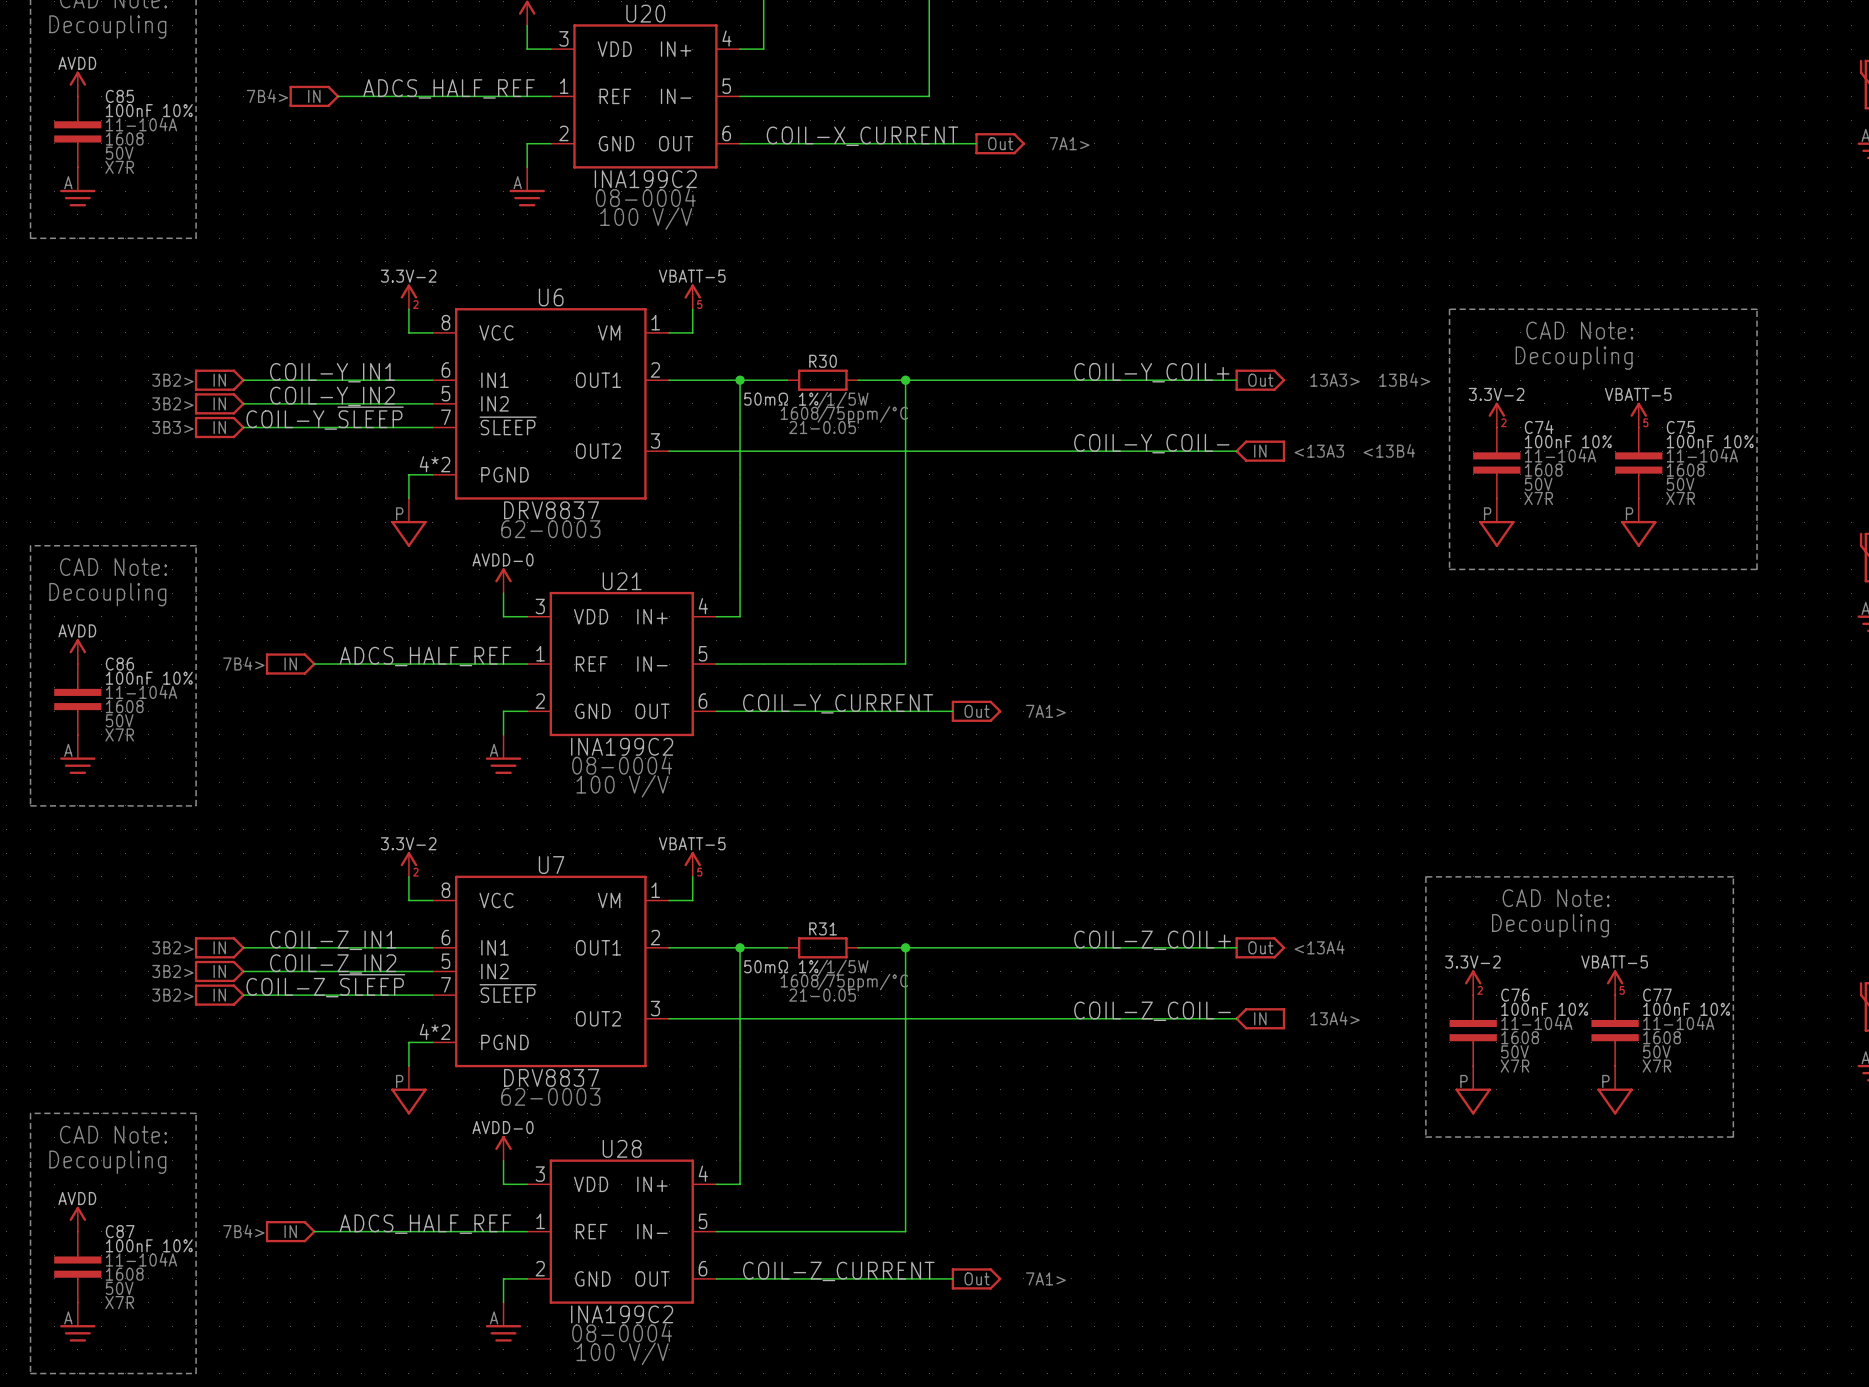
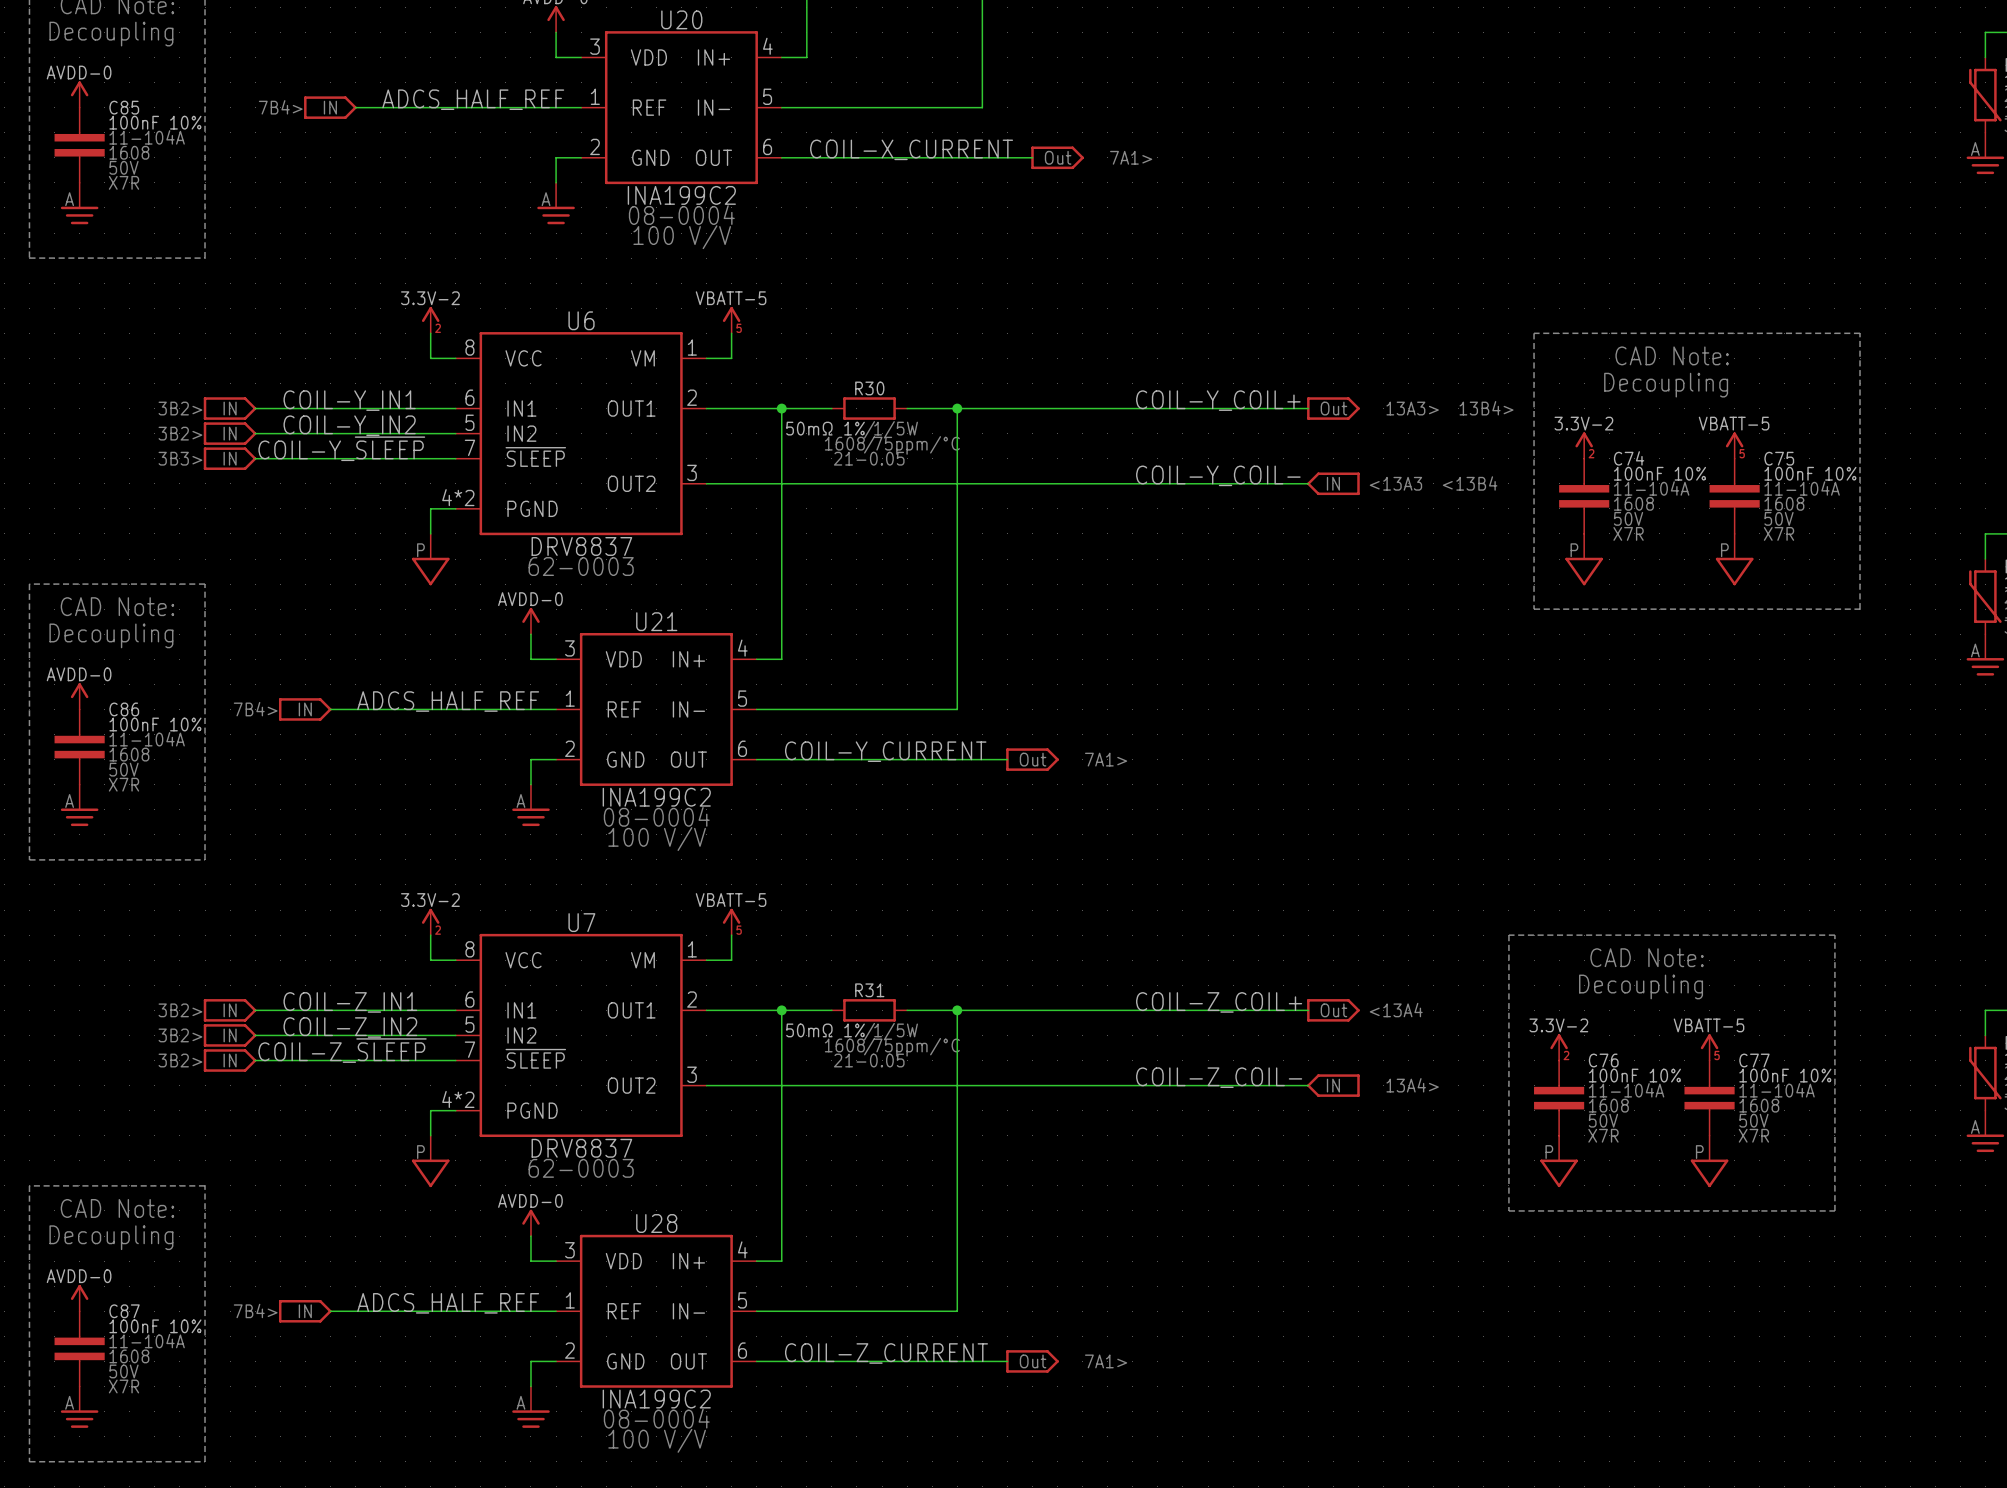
power symbol: AVDD (77, 83) -> AVDD-0 (79, 94)
power symbol: AVDD (77, 651) -> AVDD-0 (79, 696)
power symbol: AVDD (77, 1219) -> AVDD-0 (79, 1298)

